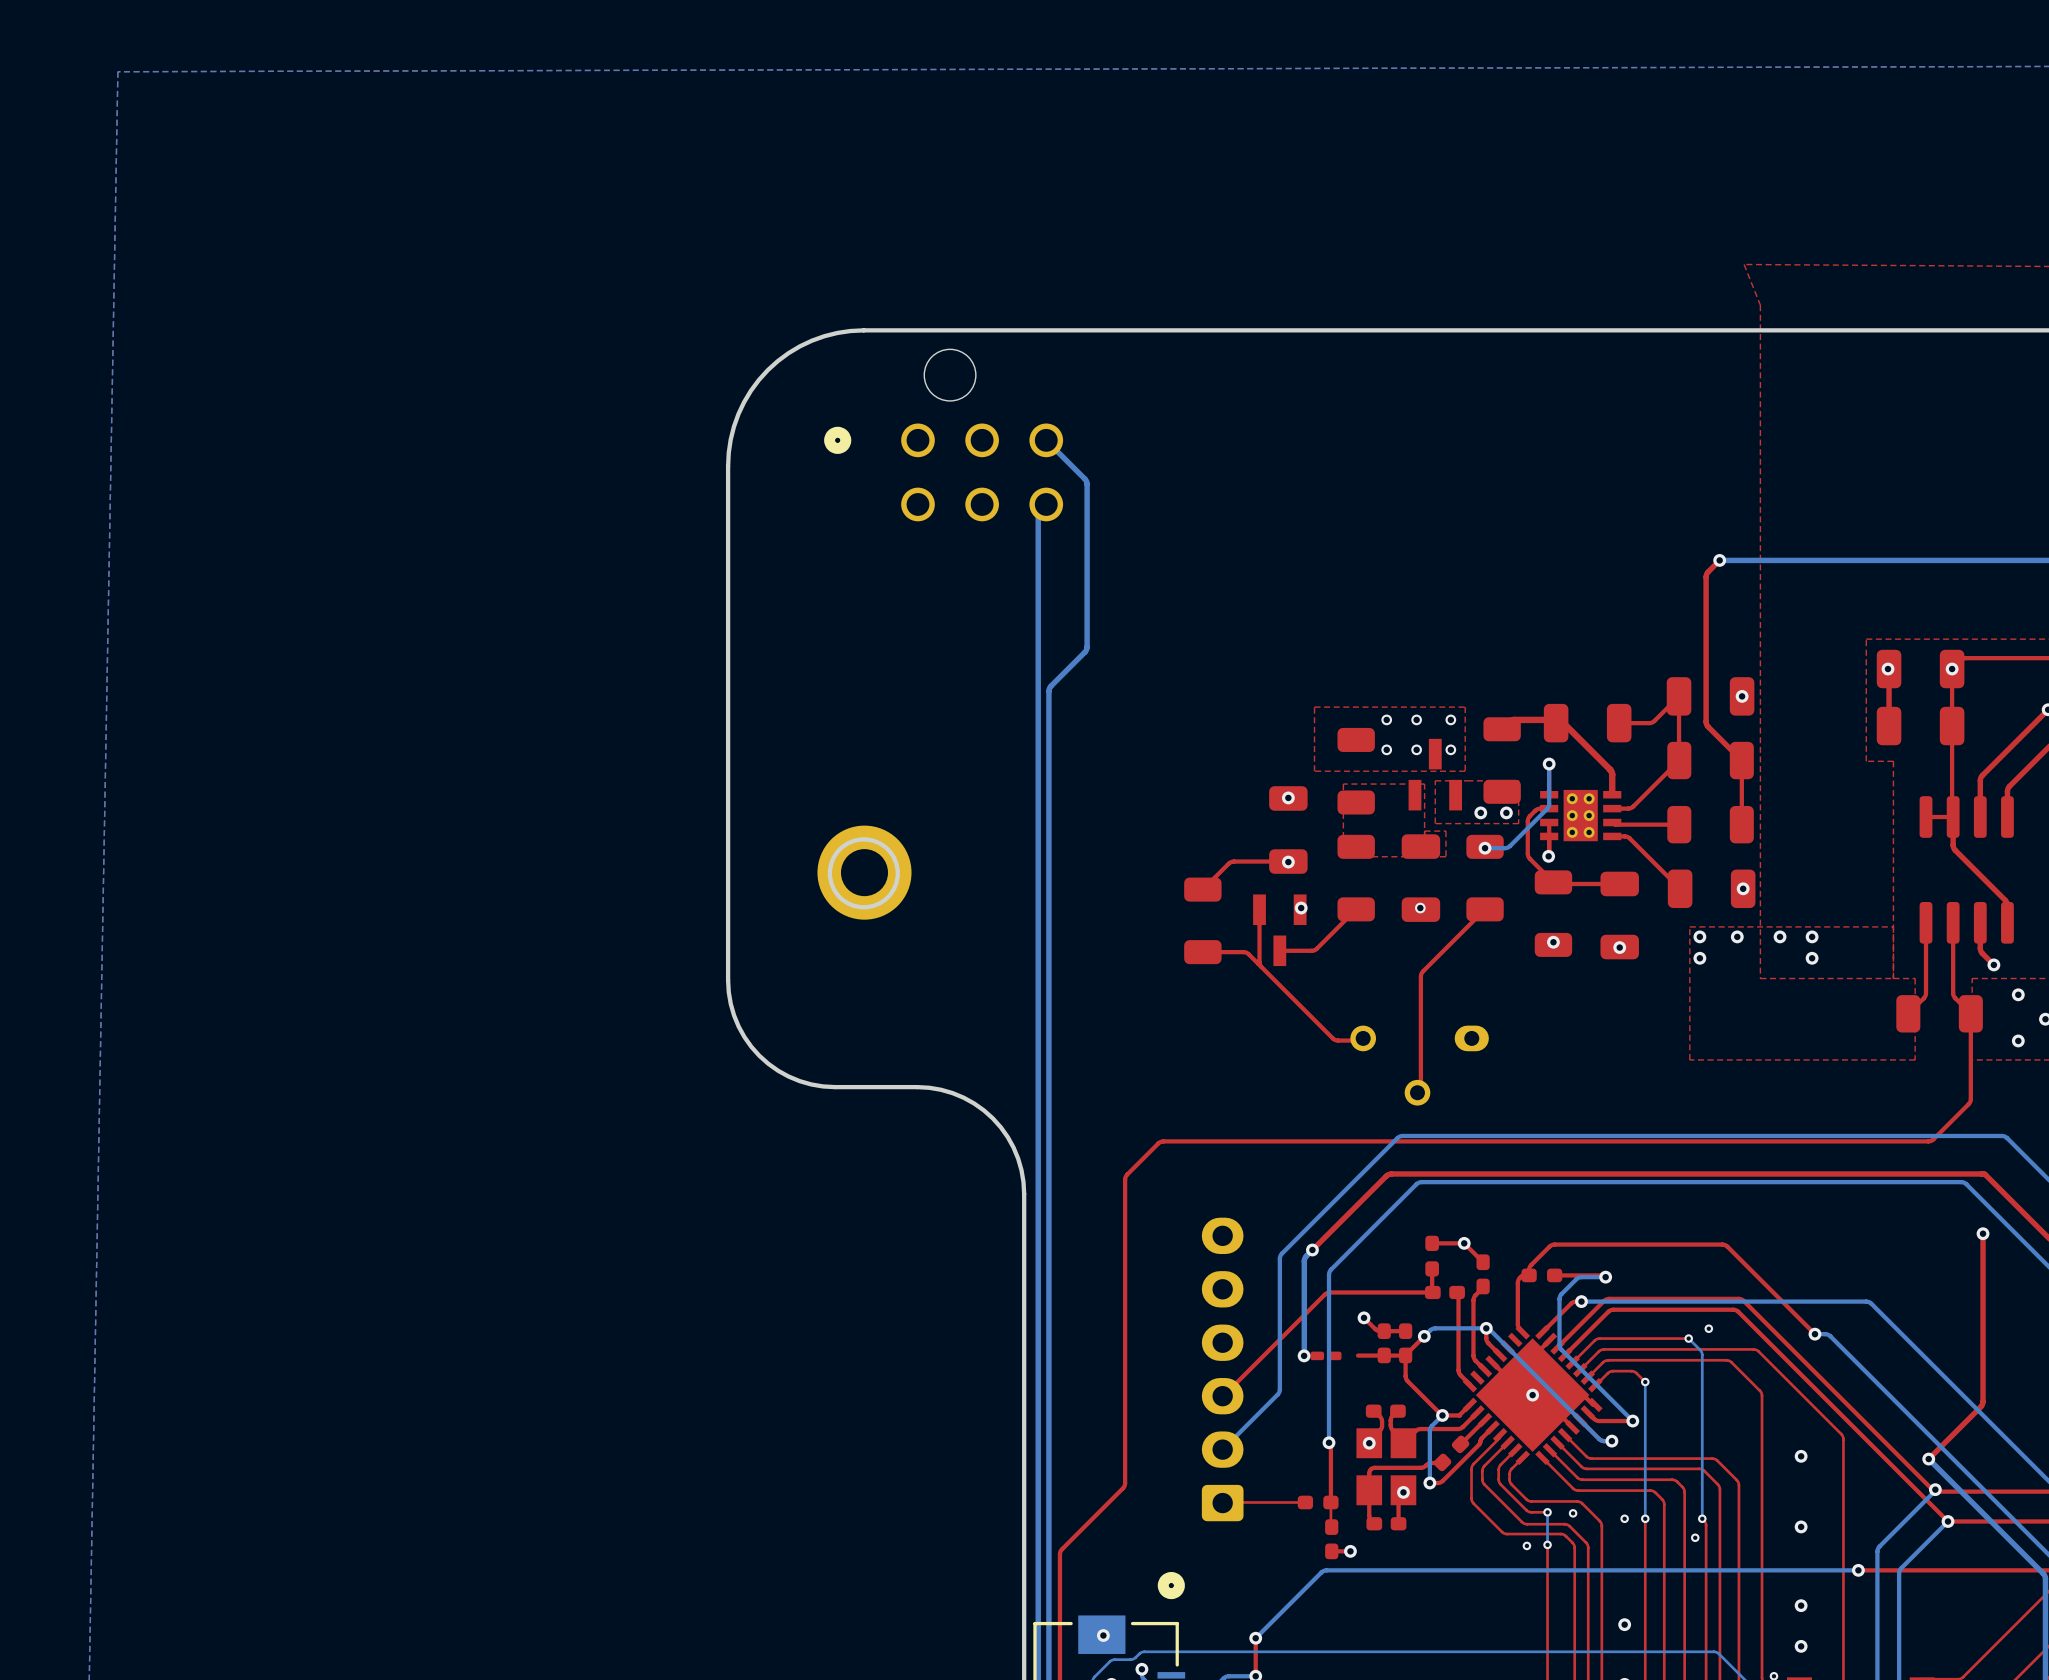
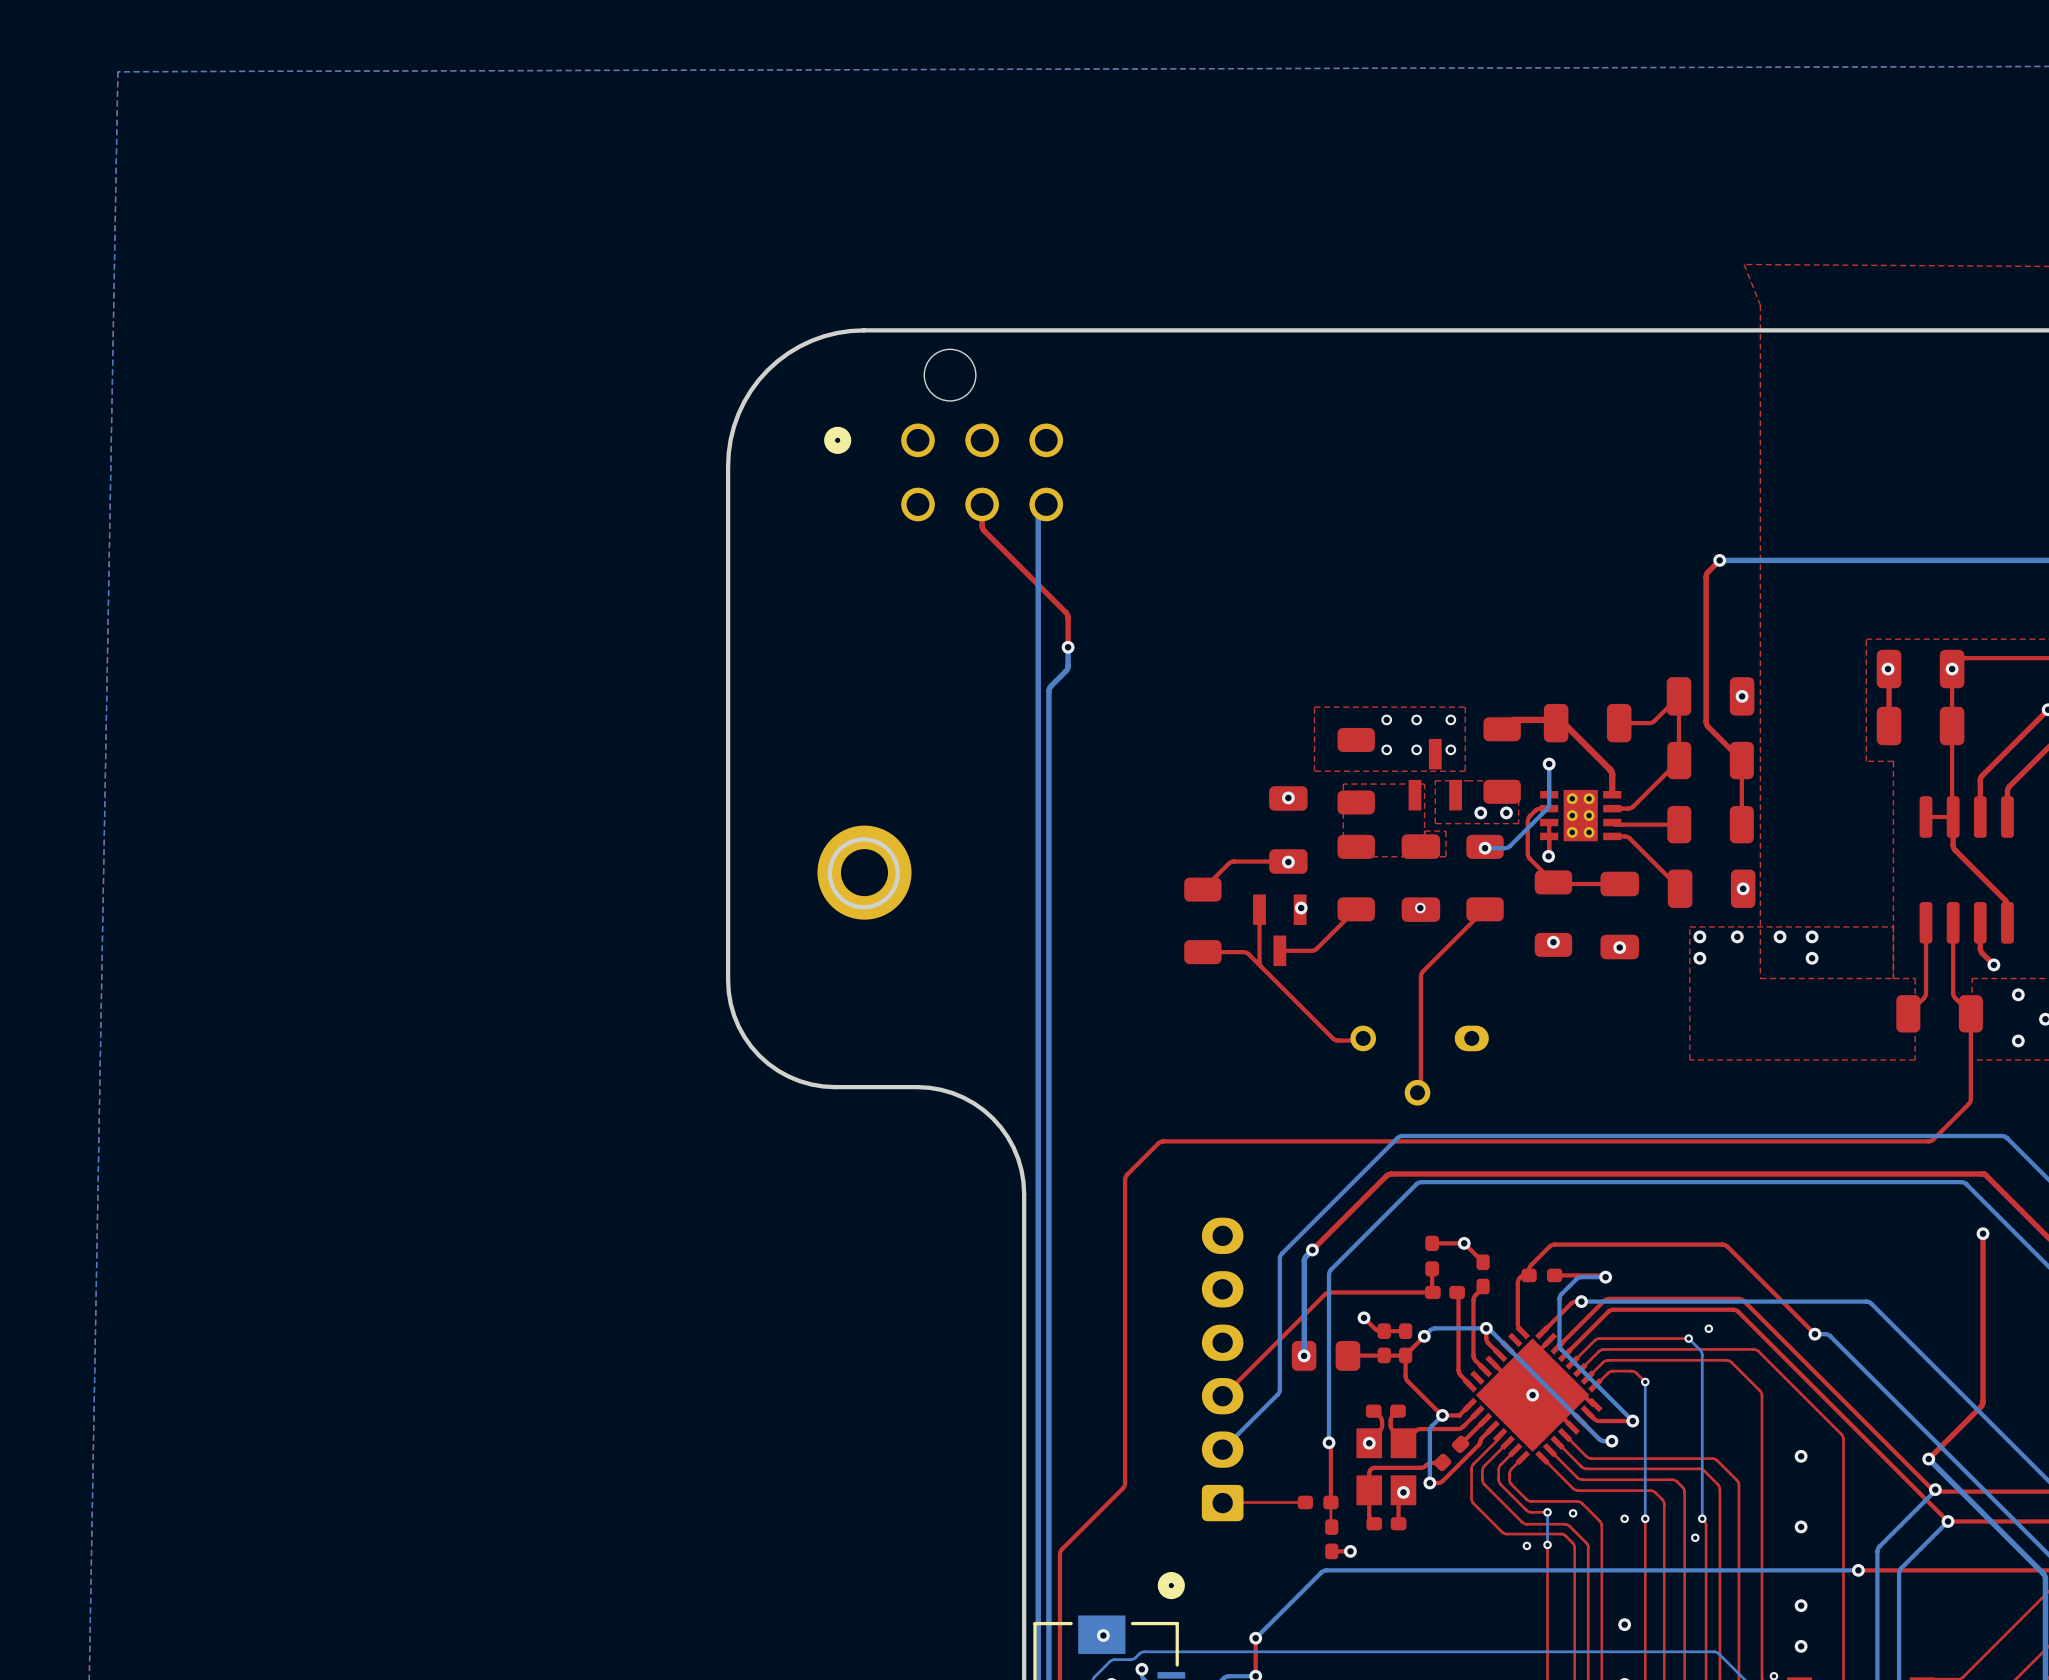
bottom track: (1046, 440) (1084, 479) (1087, 483) (1087, 647) (1065, 671) -> (1068, 647) (1068, 666) (1065, 671)
top track: none -> (982, 504) (983, 530) (1066, 613) (1068, 647)
via: none -> (1068, 647)
part footprint: [1310, 1351, 1342, 1361] -> [1291, 1340, 1361, 1371]

